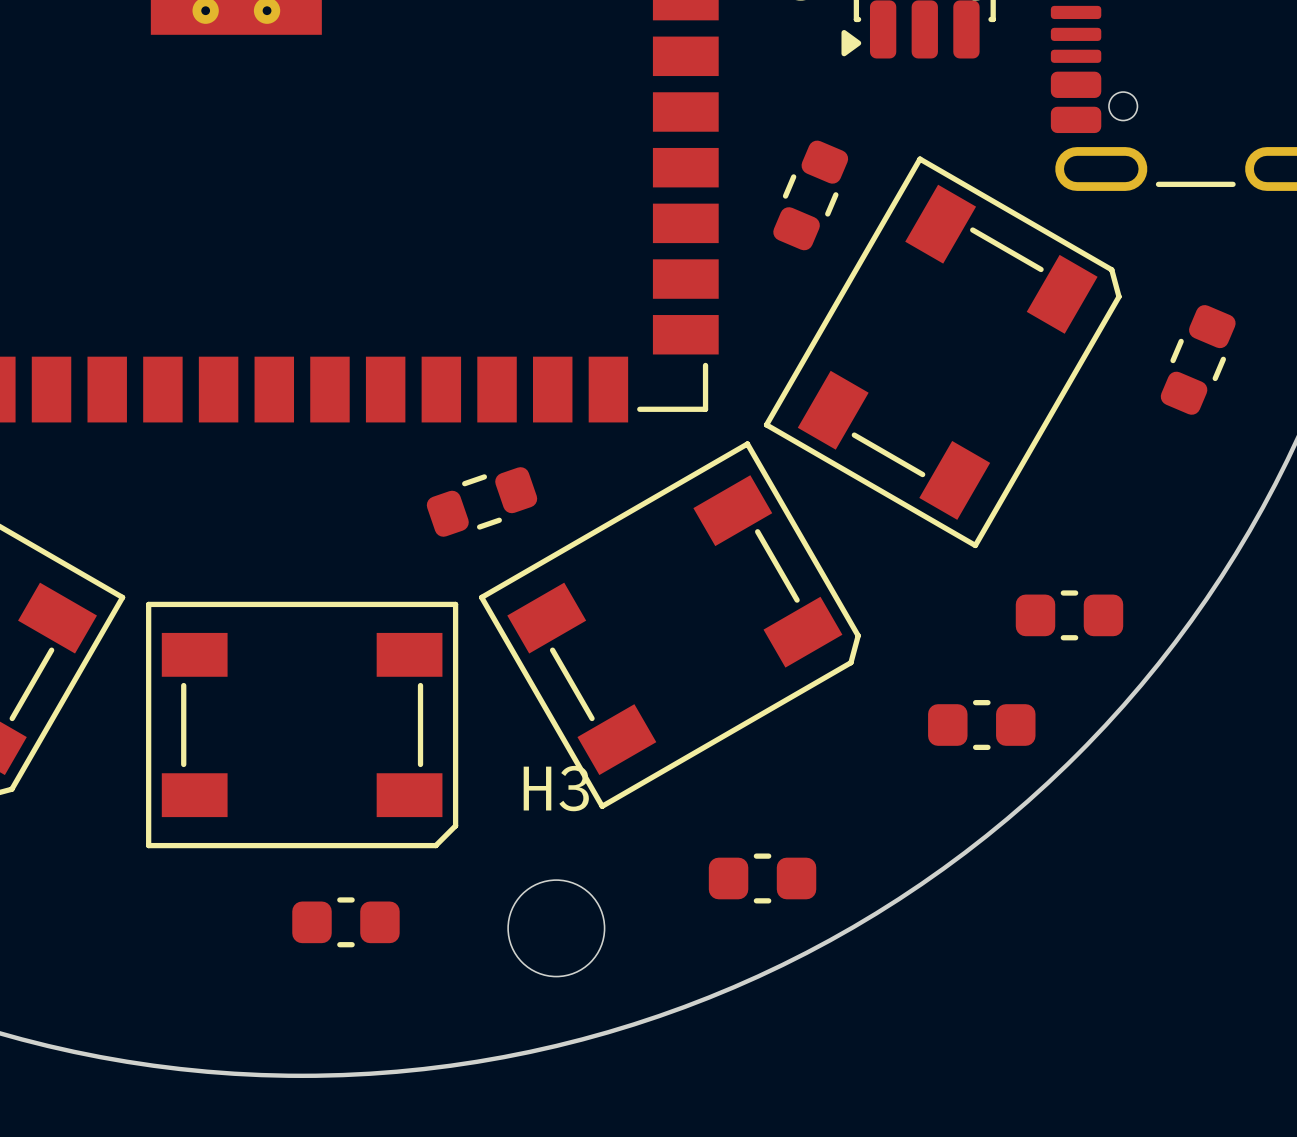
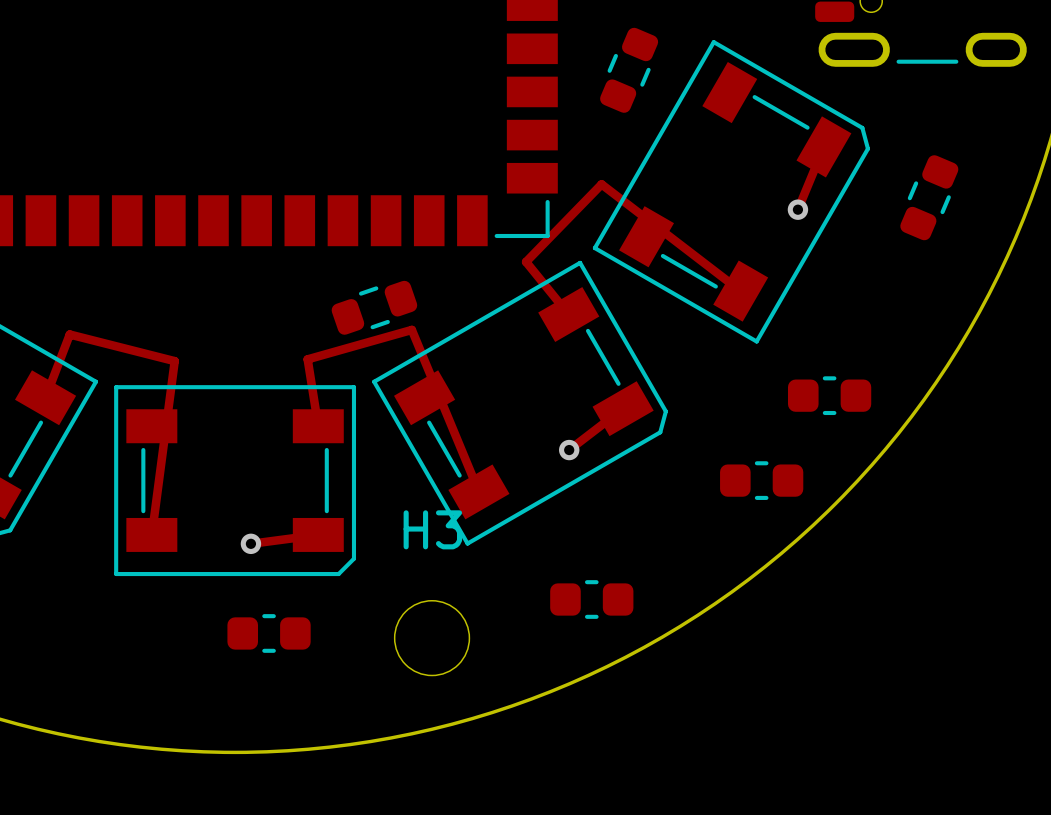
track: none -> (823, 146) (797, 209)
via: none -> (797, 209)
track: none -> (740, 291) (601, 184) (526, 261) (568, 314)
track: none -> (45, 397) (69, 334) (174, 361) (151, 534)
track: none -> (623, 408) (569, 450)
track: none -> (318, 426) (307, 359) (411, 329) (478, 491)
via: none -> (569, 450)
track: none -> (318, 534) (250, 543)
via: none -> (250, 543)

